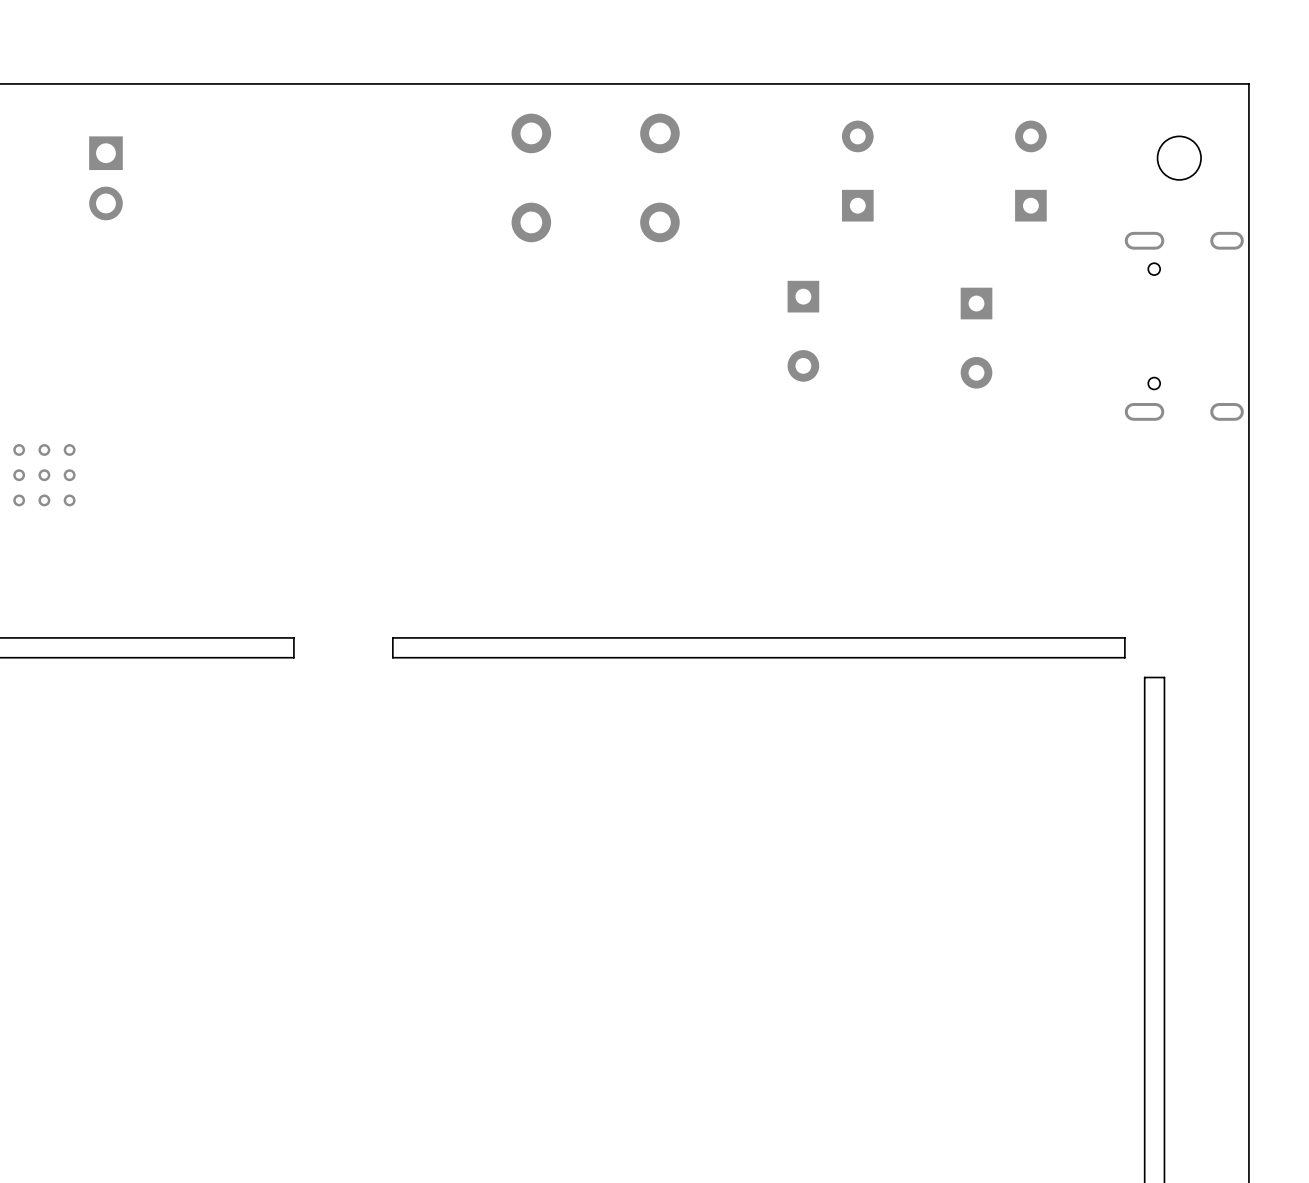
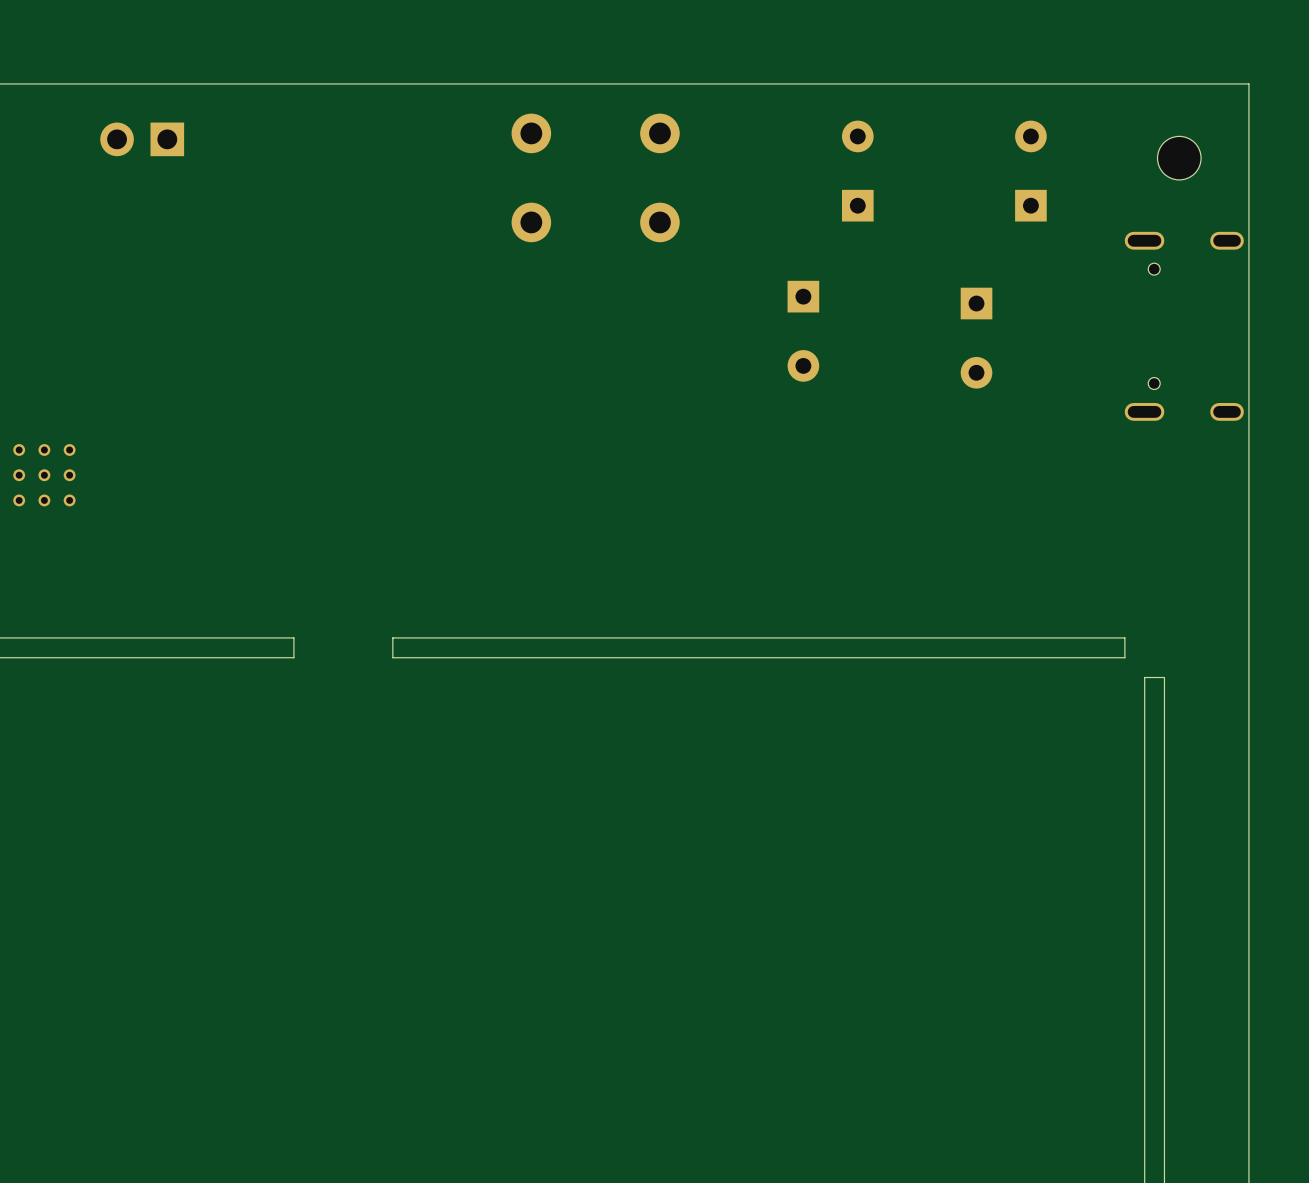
part rotation: 0° (105, 178) -> 90° clockwise (142, 139)
part position: (105, 178) -> (142, 139)

